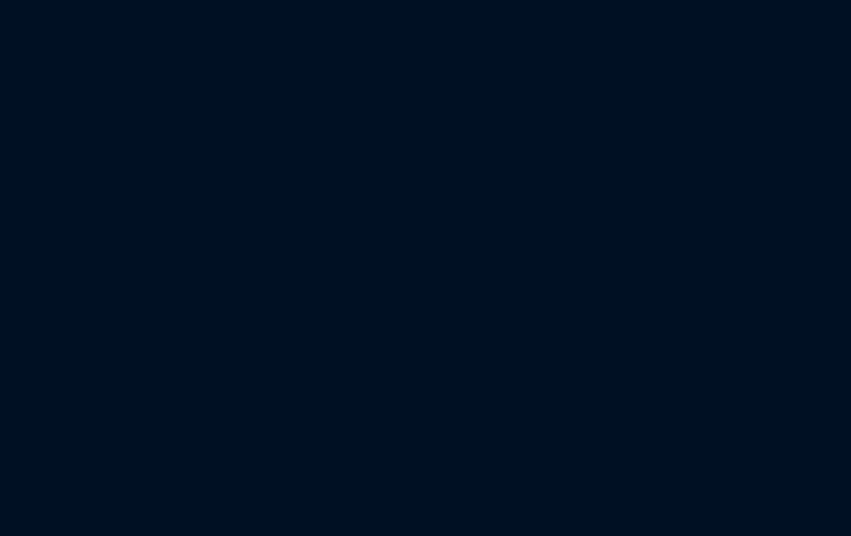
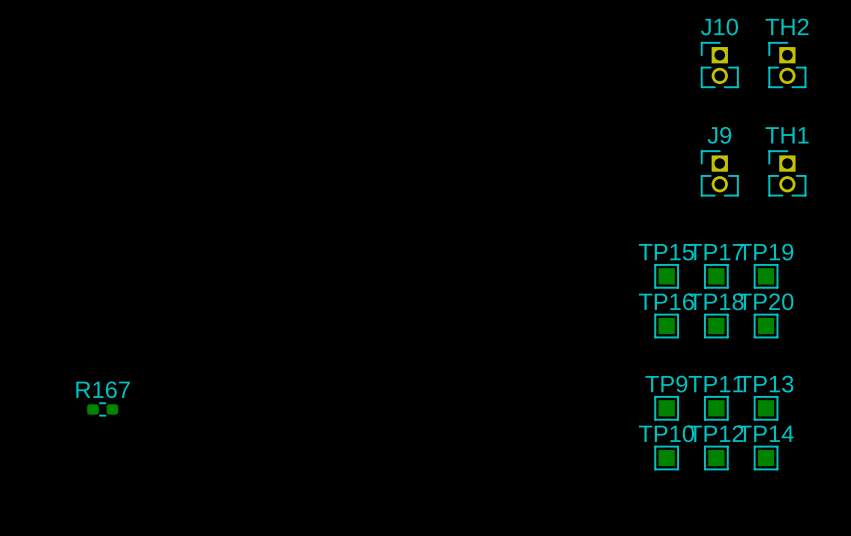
J10: none -> (719, 65)
TH2: none -> (787, 65)
J9: none -> (719, 173)
TH1: none -> (787, 173)
TP15: none -> (666, 276)
TP17: none -> (716, 276)
TP19: none -> (766, 276)
TP16: none -> (666, 326)
TP18: none -> (716, 326)
TP20: none -> (766, 326)
TP9: none -> (666, 408)
TP11: none -> (716, 408)
TP13: none -> (766, 408)
R167: none -> (102, 409)
TP10: none -> (666, 458)
TP12: none -> (716, 458)
TP14: none -> (766, 458)

